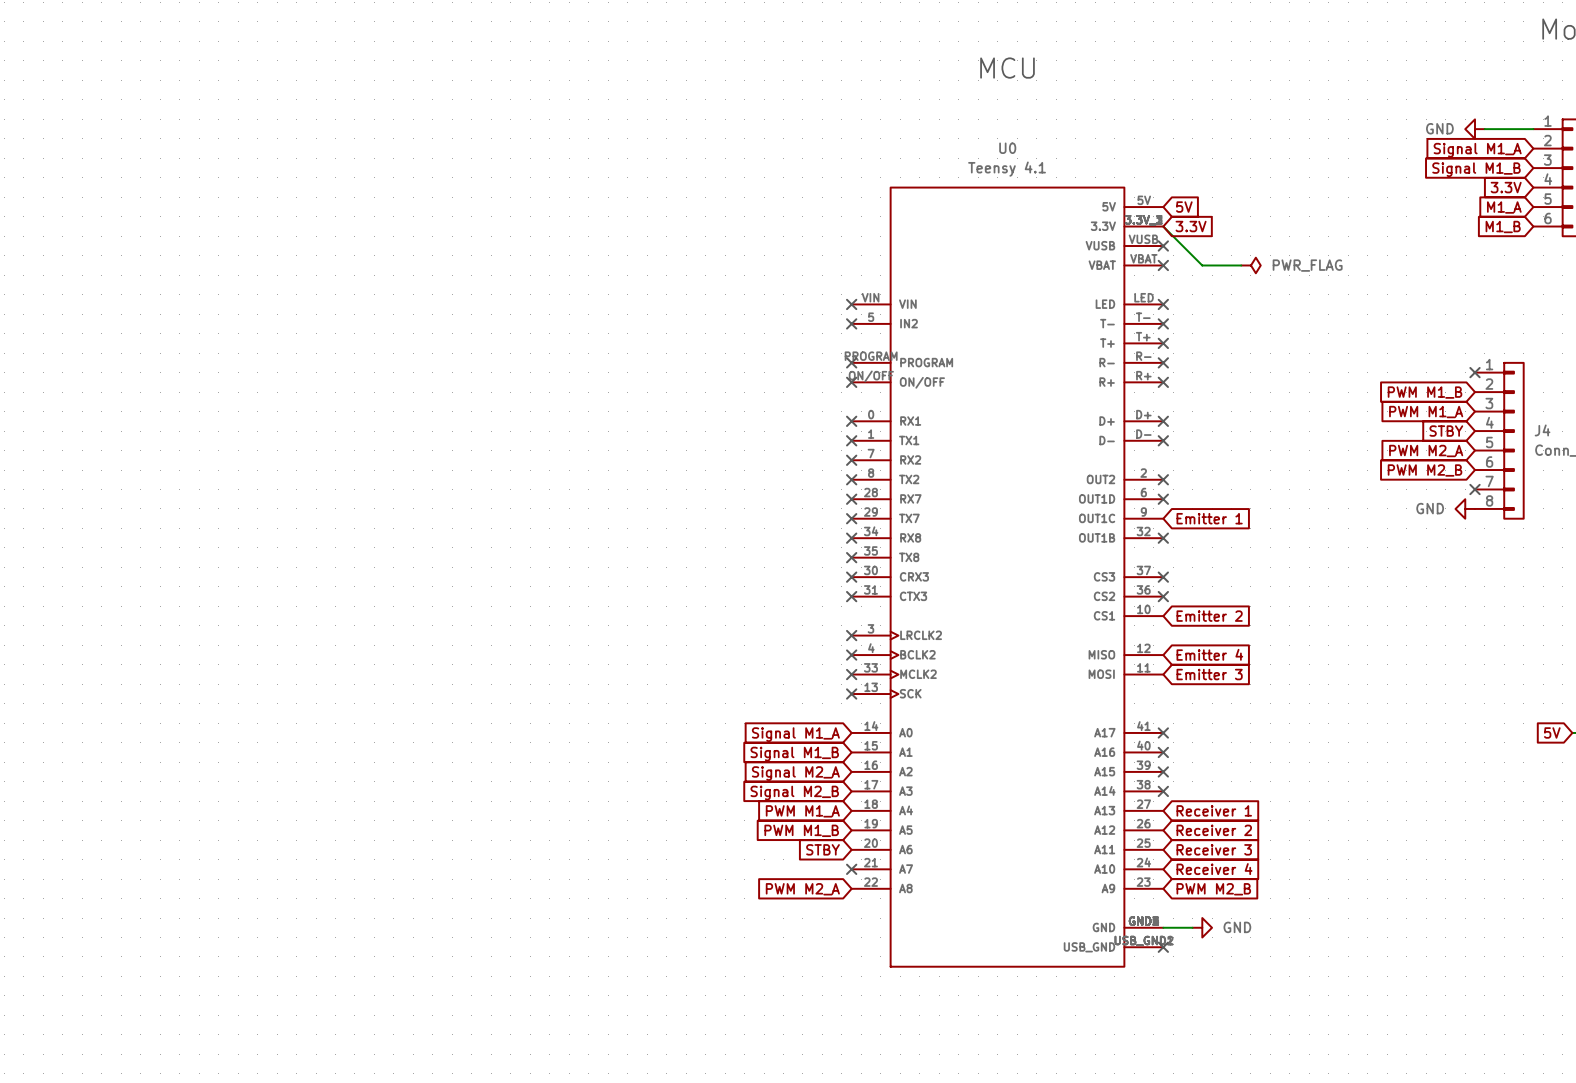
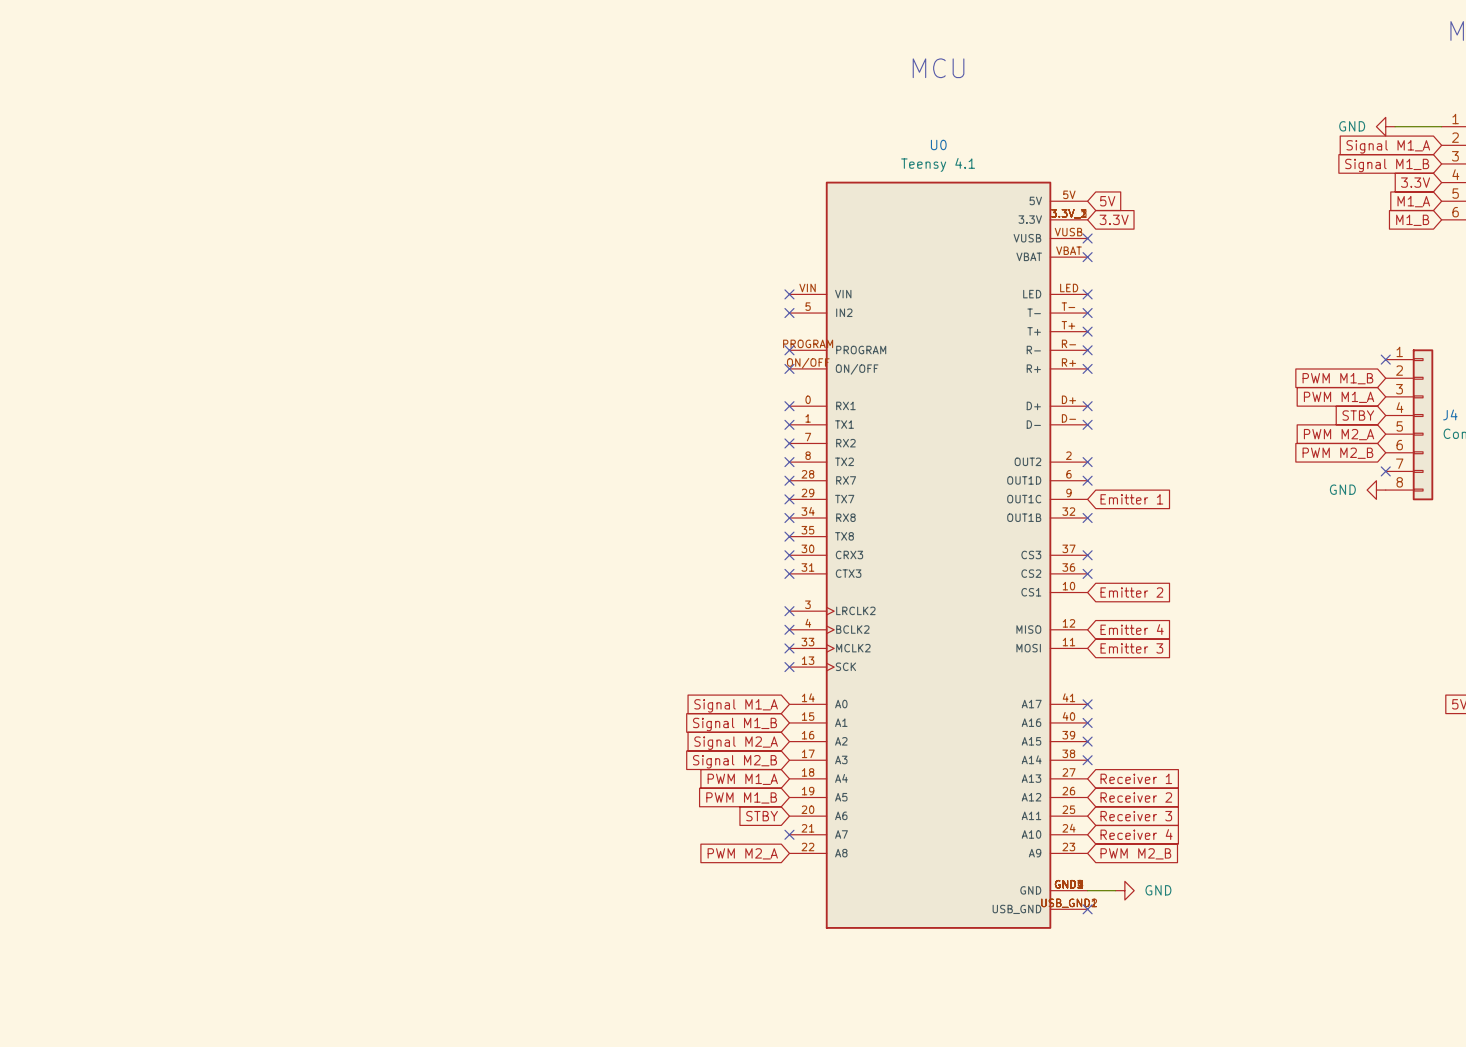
wire: (1163, 226) (1202, 265) (1241, 265) -> none
power symbol: PWR_FLAG (1250, 265) -> none

